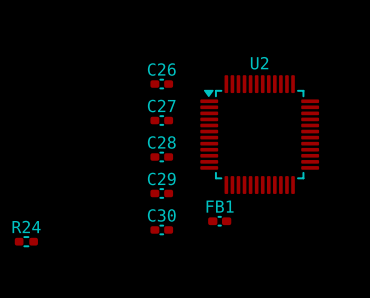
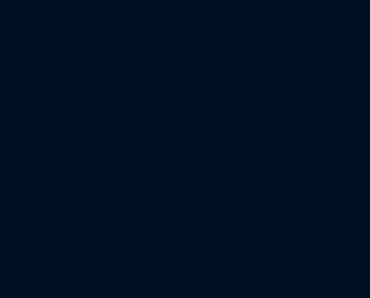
C26: (161, 84) -> none
C27: (161, 120) -> none
U2: (259, 134) -> none
C28: (161, 157) -> none
C29: (161, 193) -> none
FB1: (219, 221) -> none
C30: (161, 229) -> none
R24: (26, 241) -> none

